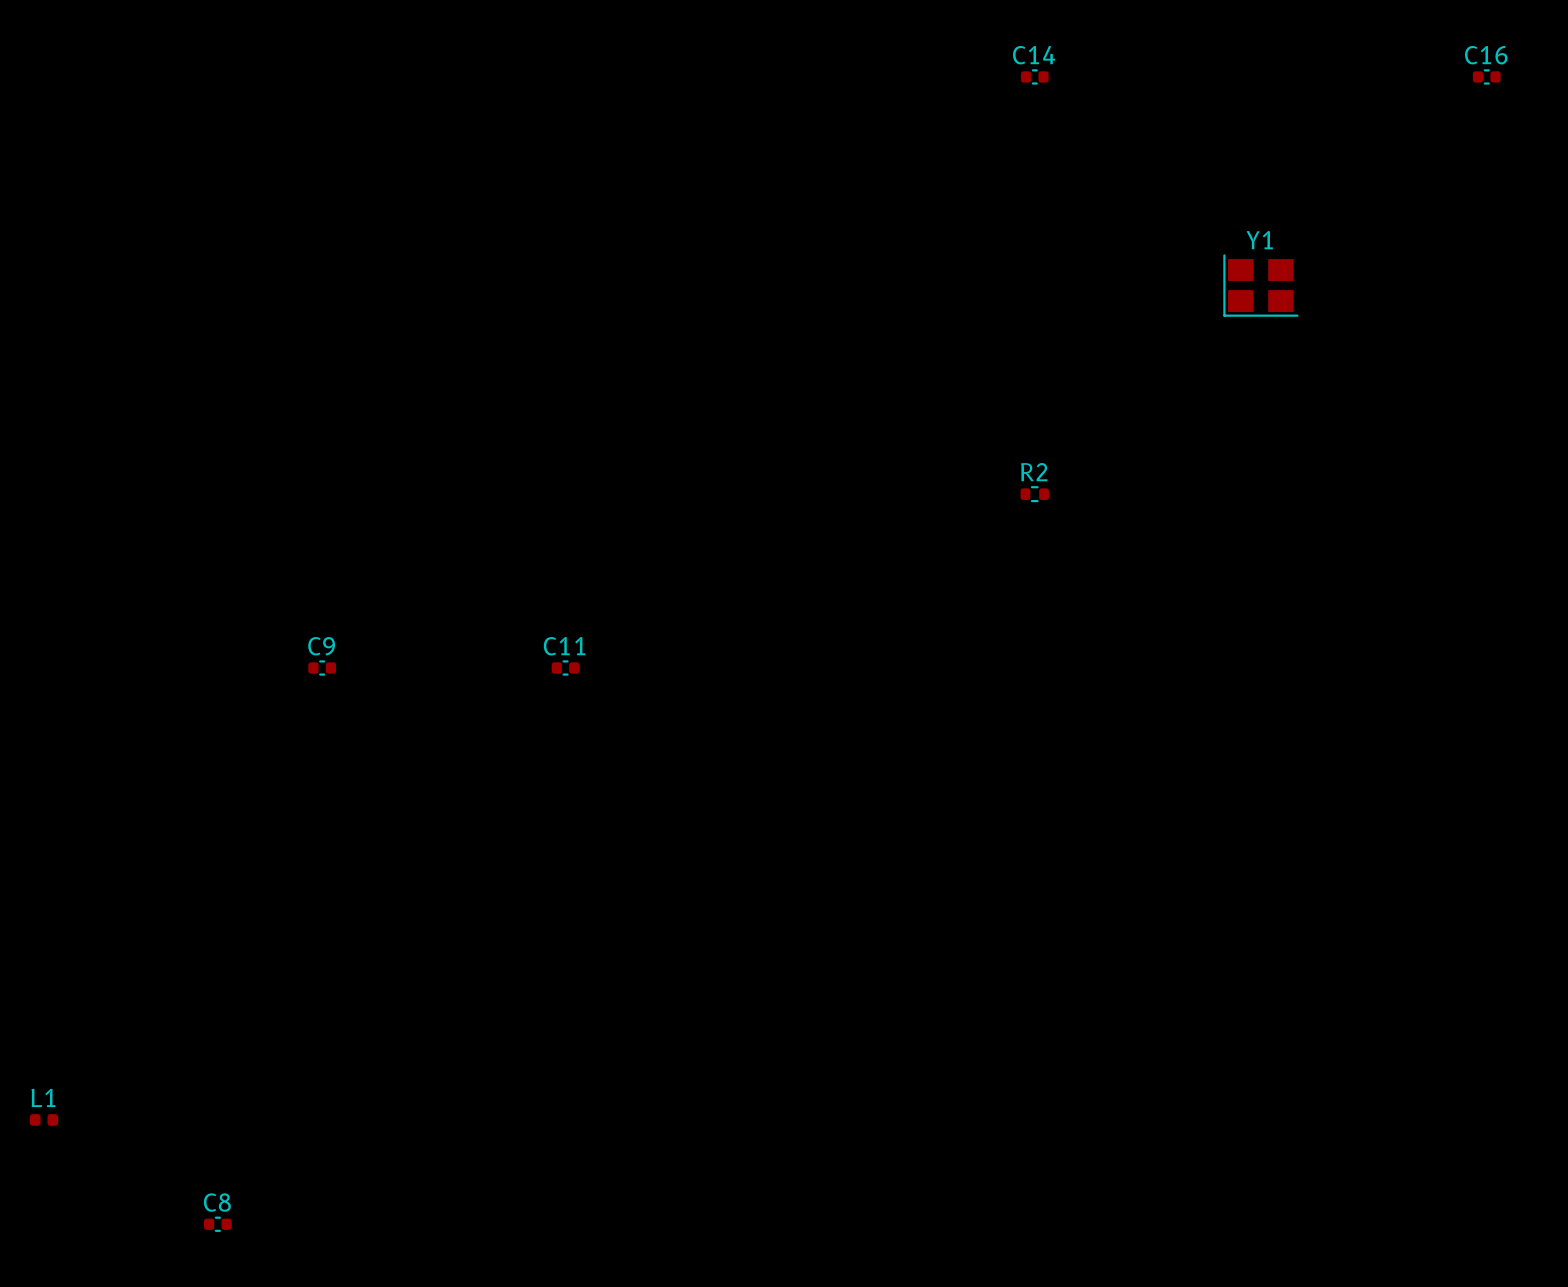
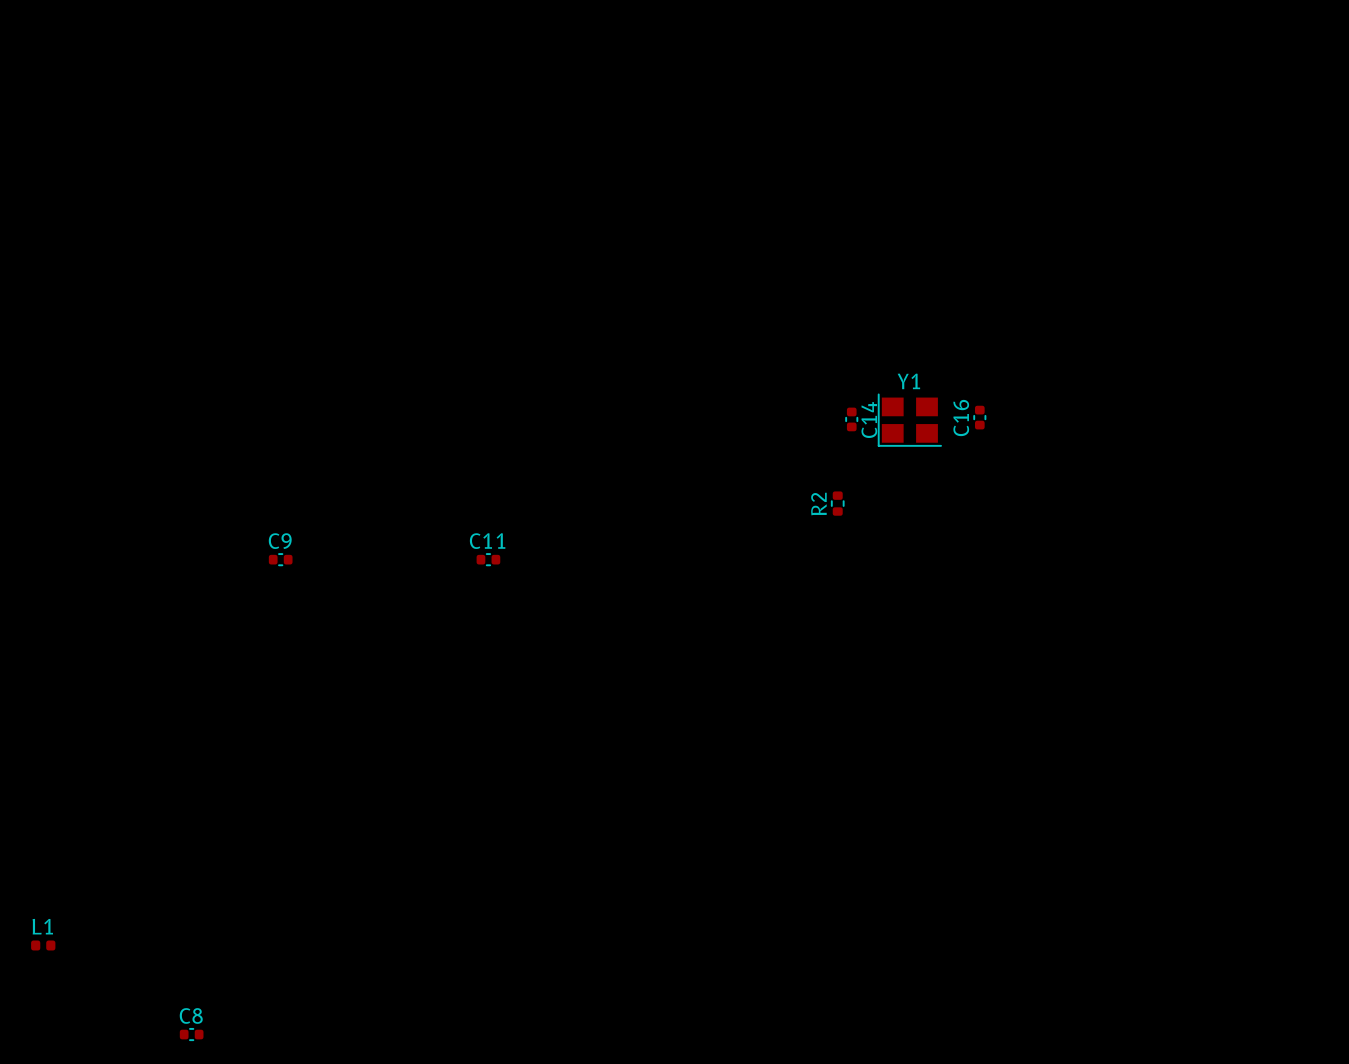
C14 rotation: 0° (1034, 76) -> 90° clockwise (851, 419)
C14 position: (1034, 76) -> (851, 419)
C16 rotation: 0° (1486, 76) -> 90° clockwise (979, 417)
C16 position: (1486, 76) -> (979, 417)
Y1 position: (1260, 285) -> (909, 420)
R2 rotation: 0° (1034, 494) -> 90° clockwise (837, 503)
R2 position: (1034, 494) -> (837, 503)

